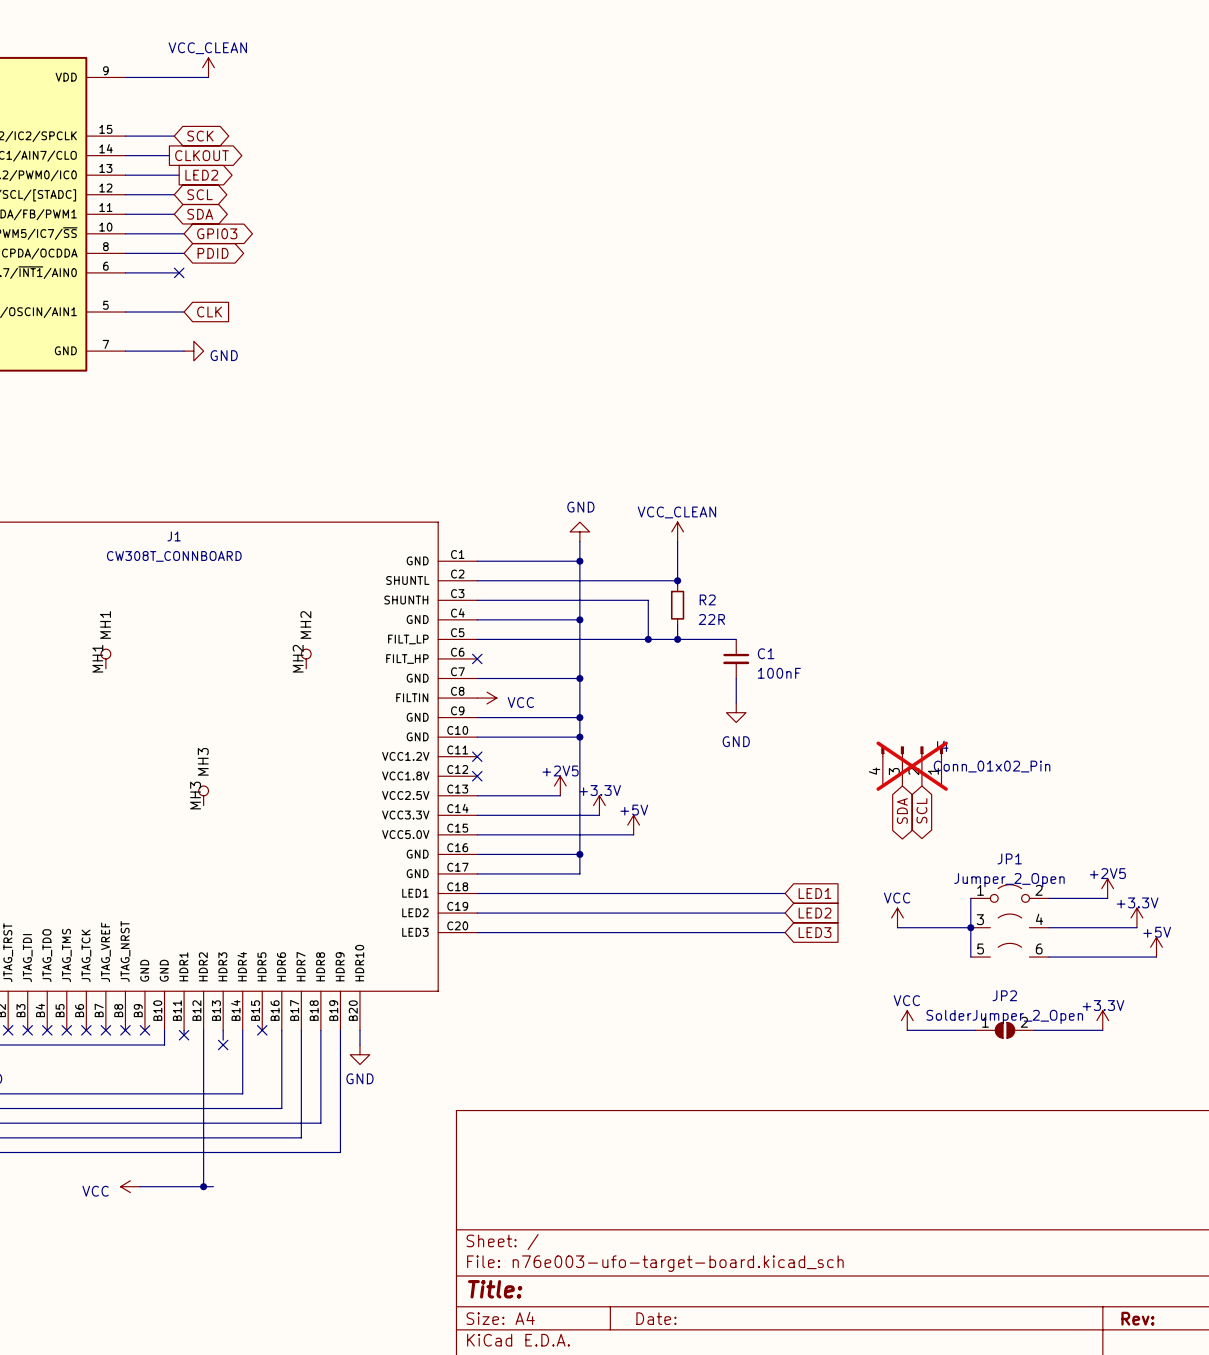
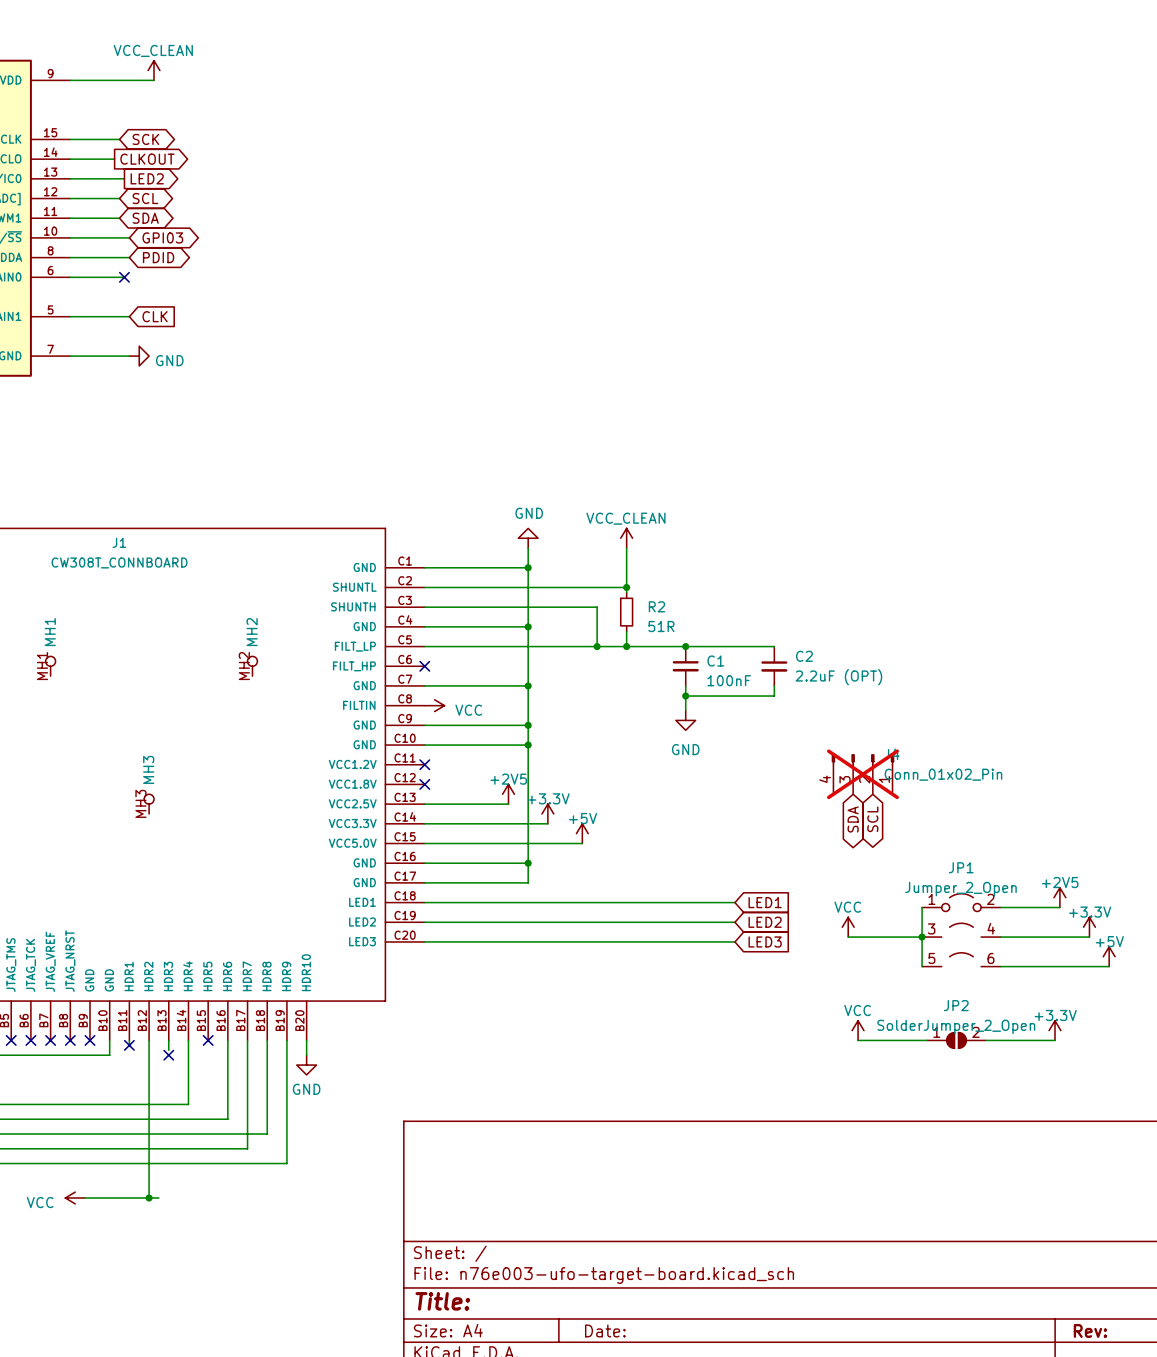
R2 value: 22R (711, 619) -> 51R (661, 626)
wire: none -> (685, 646) (774, 646)
junction: none -> (685, 646)
C2: none -> 2.2uF (OPT) (774, 666)
wire: none -> (774, 686) (774, 696) (685, 696)
junction: none -> (685, 696)

